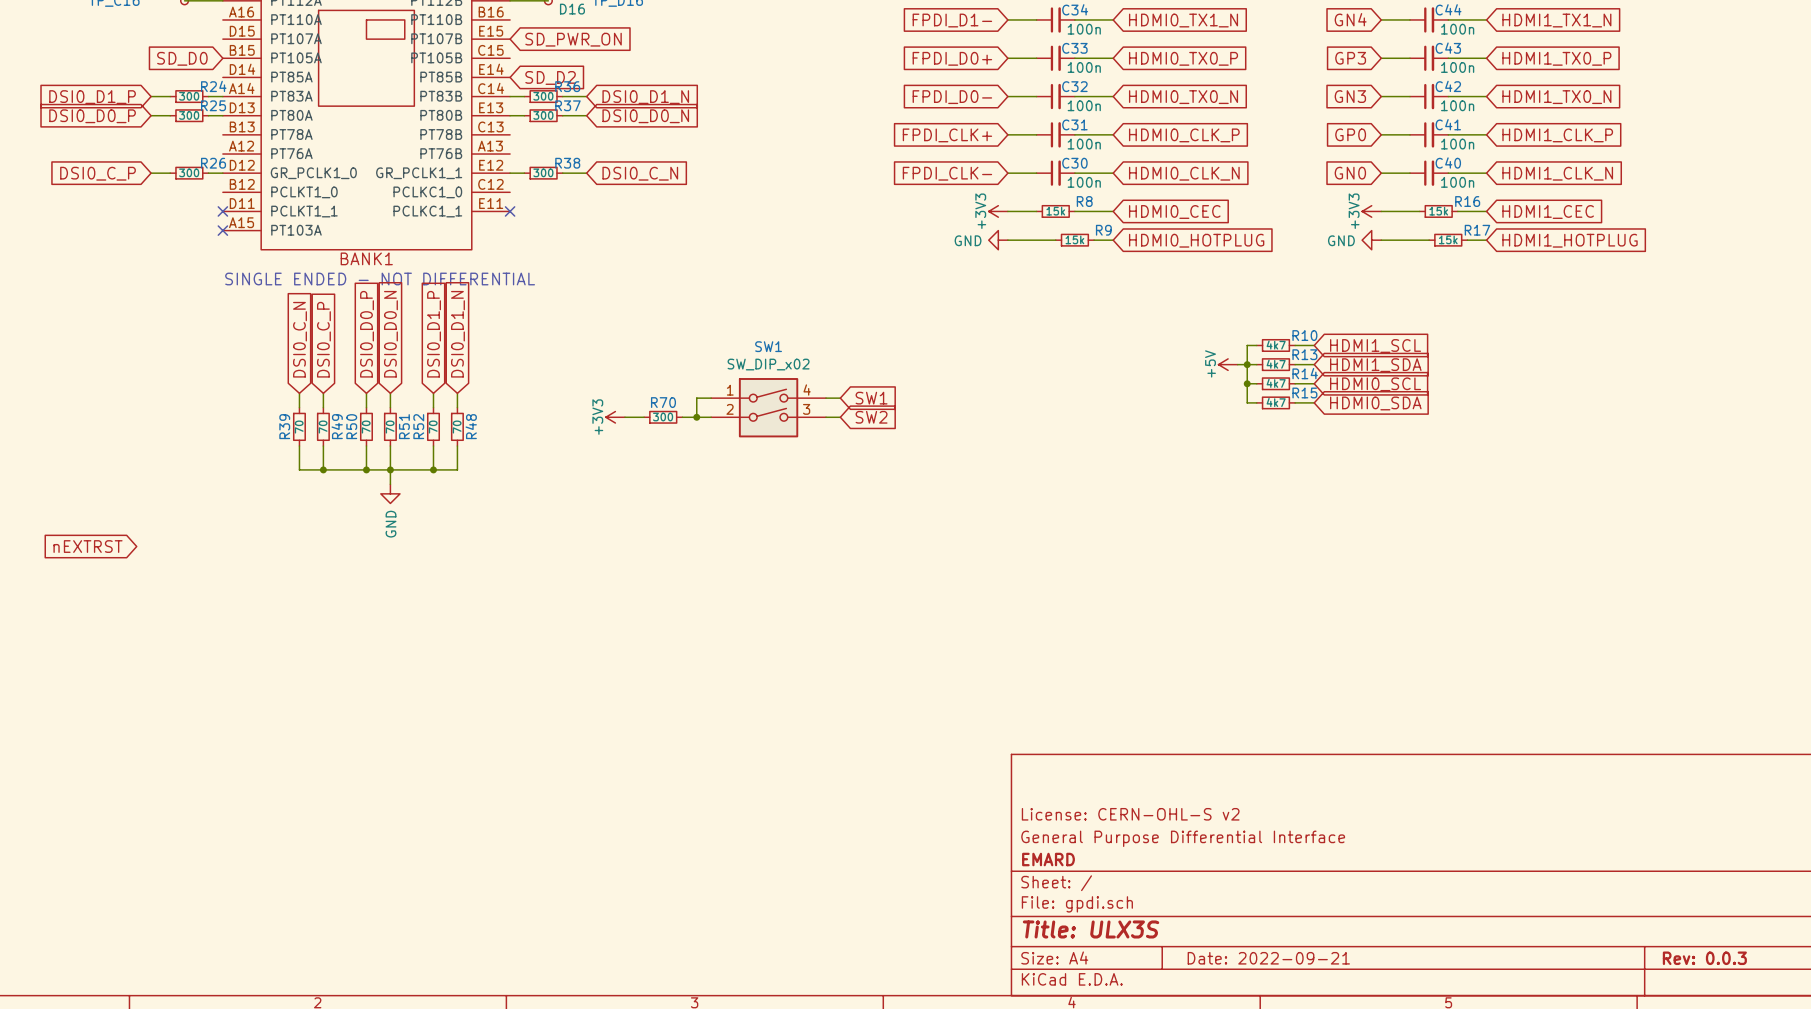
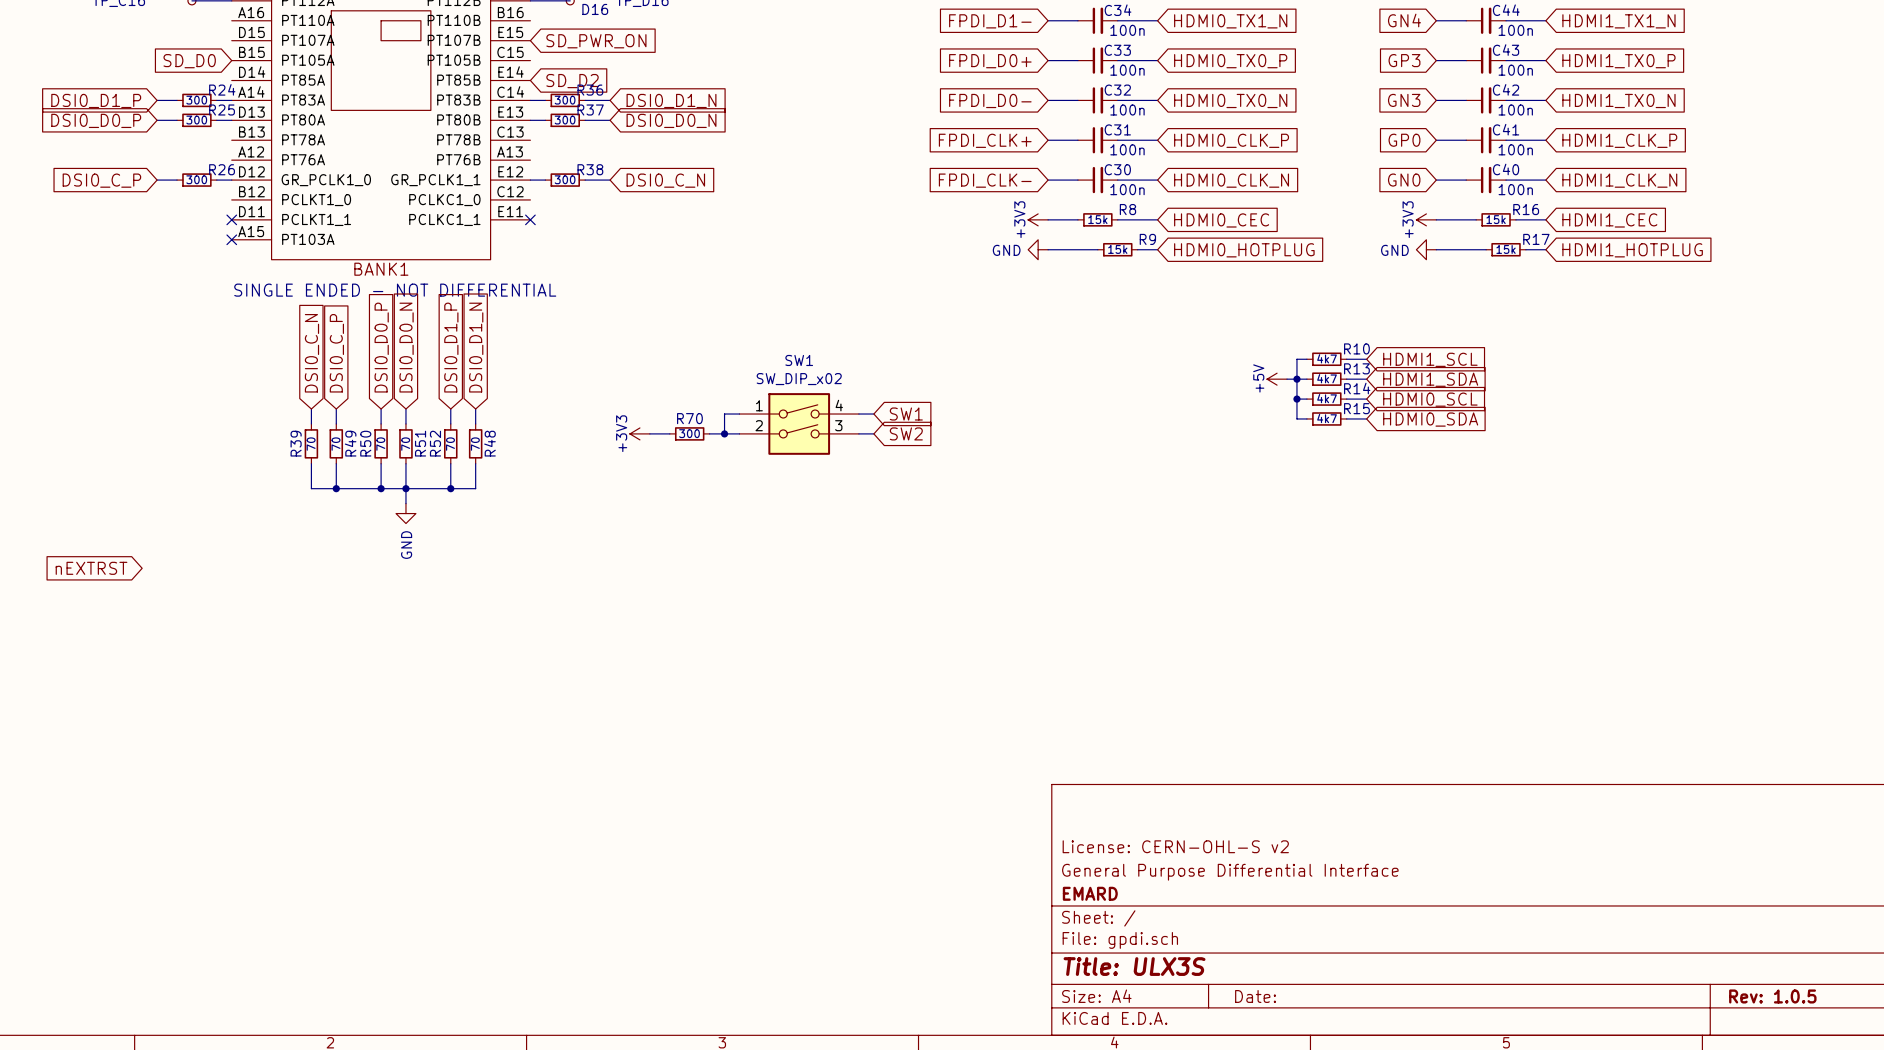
title block: Date: 2022-09-21 (1268, 958) -> Date: (1255, 996)
title block: Rev: 0.0.3 (1704, 958) -> Rev: 1.0.5 (1772, 996)

